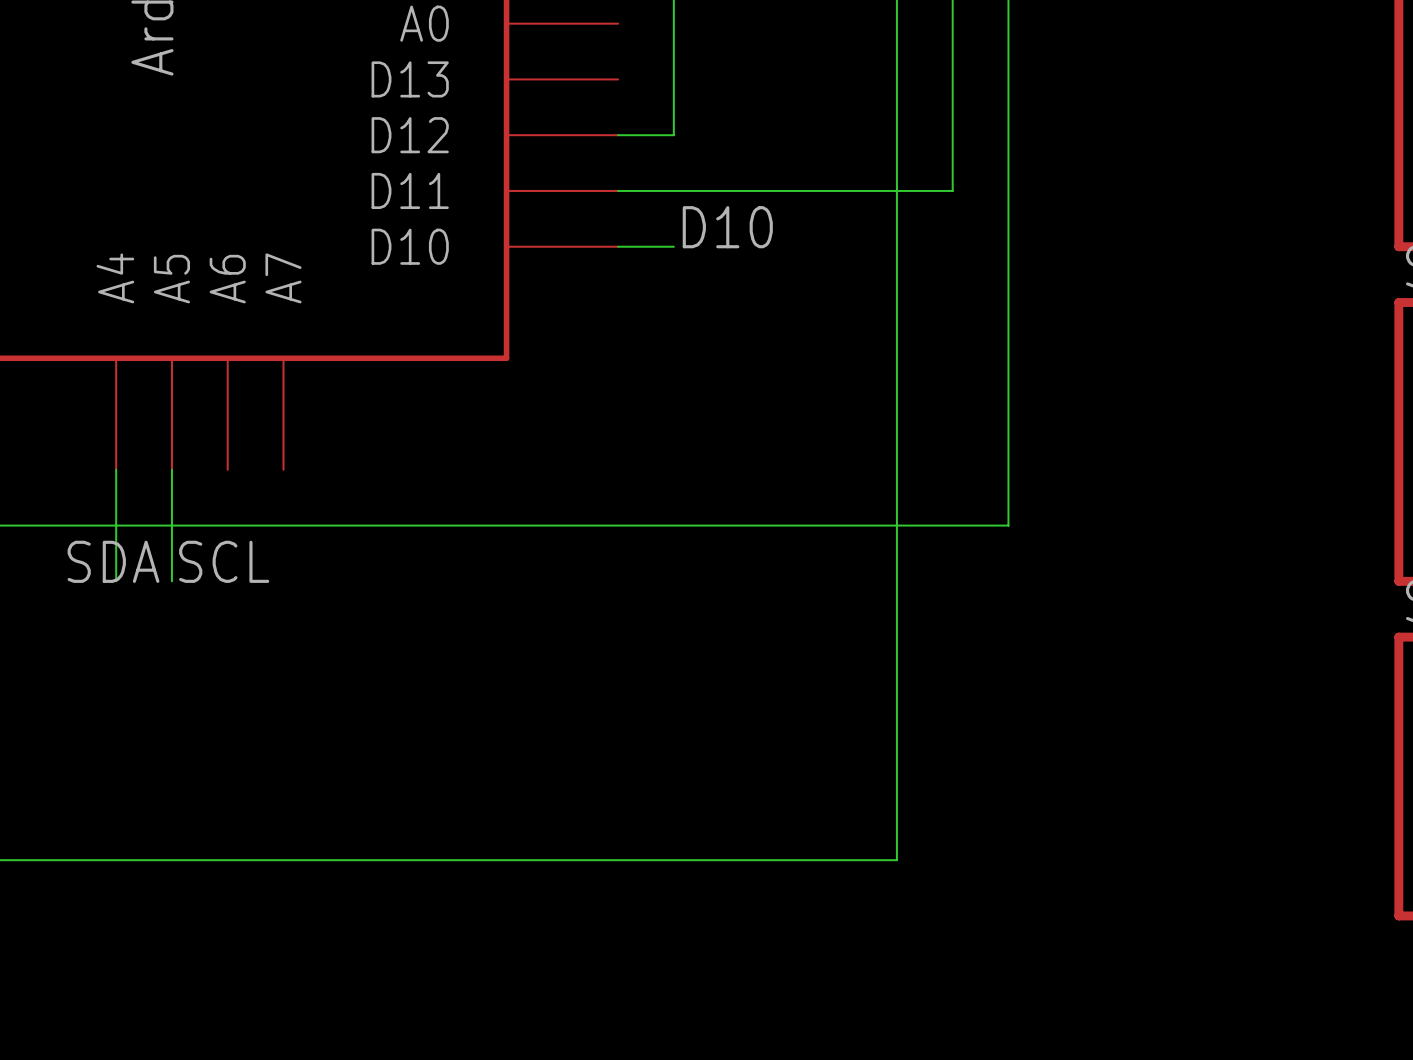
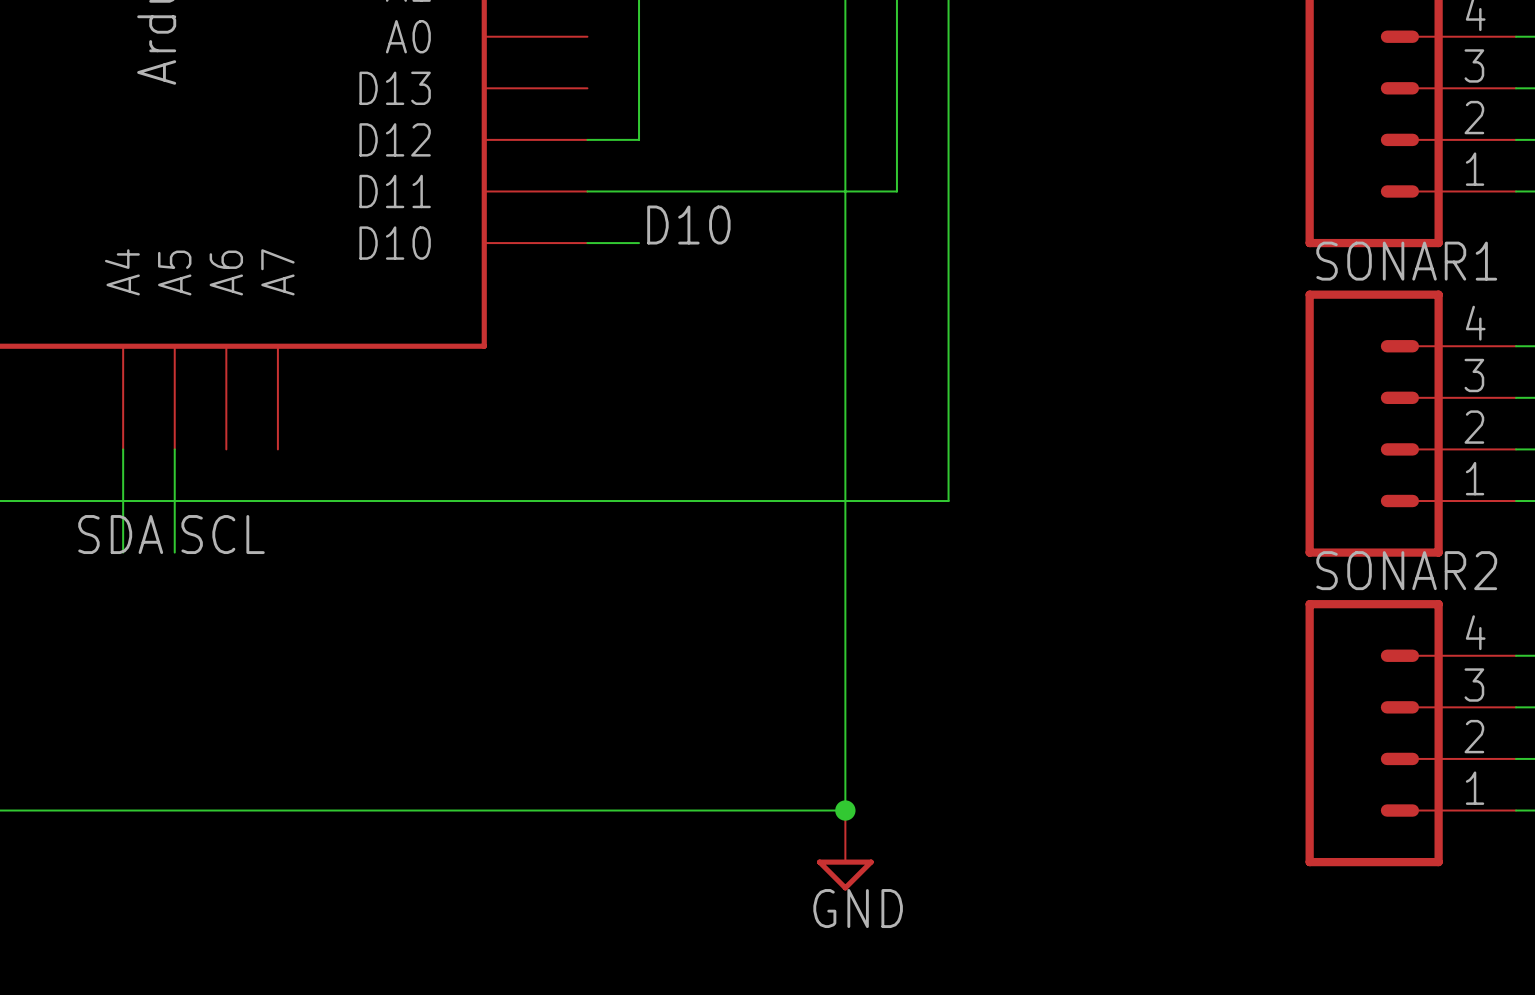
junction: none -> (845, 810)
power symbol: none -> GND (845, 850)

